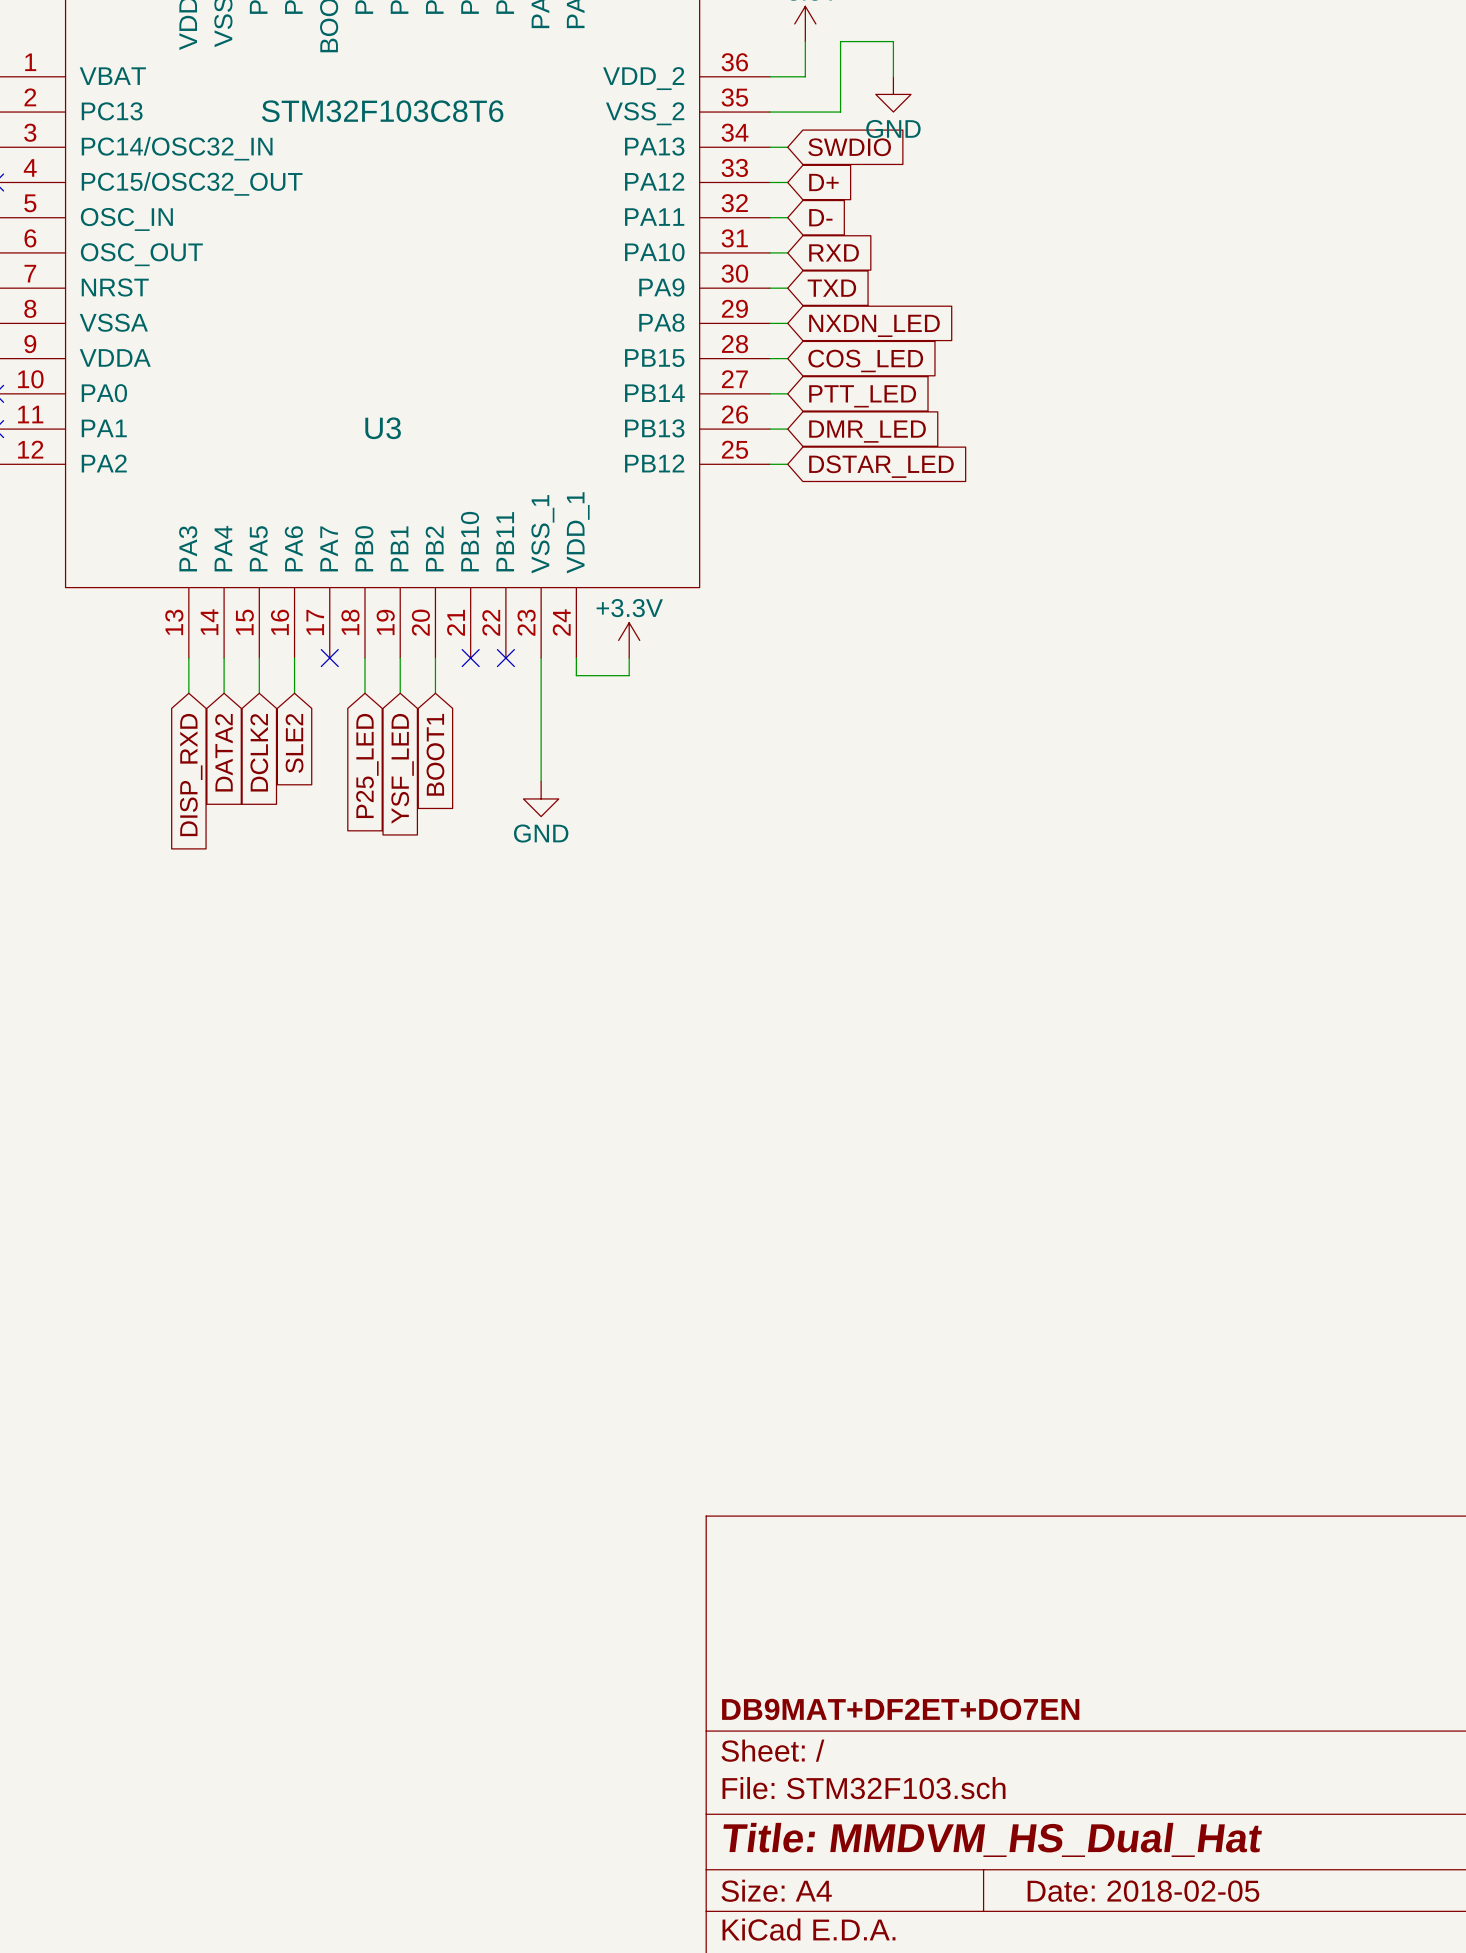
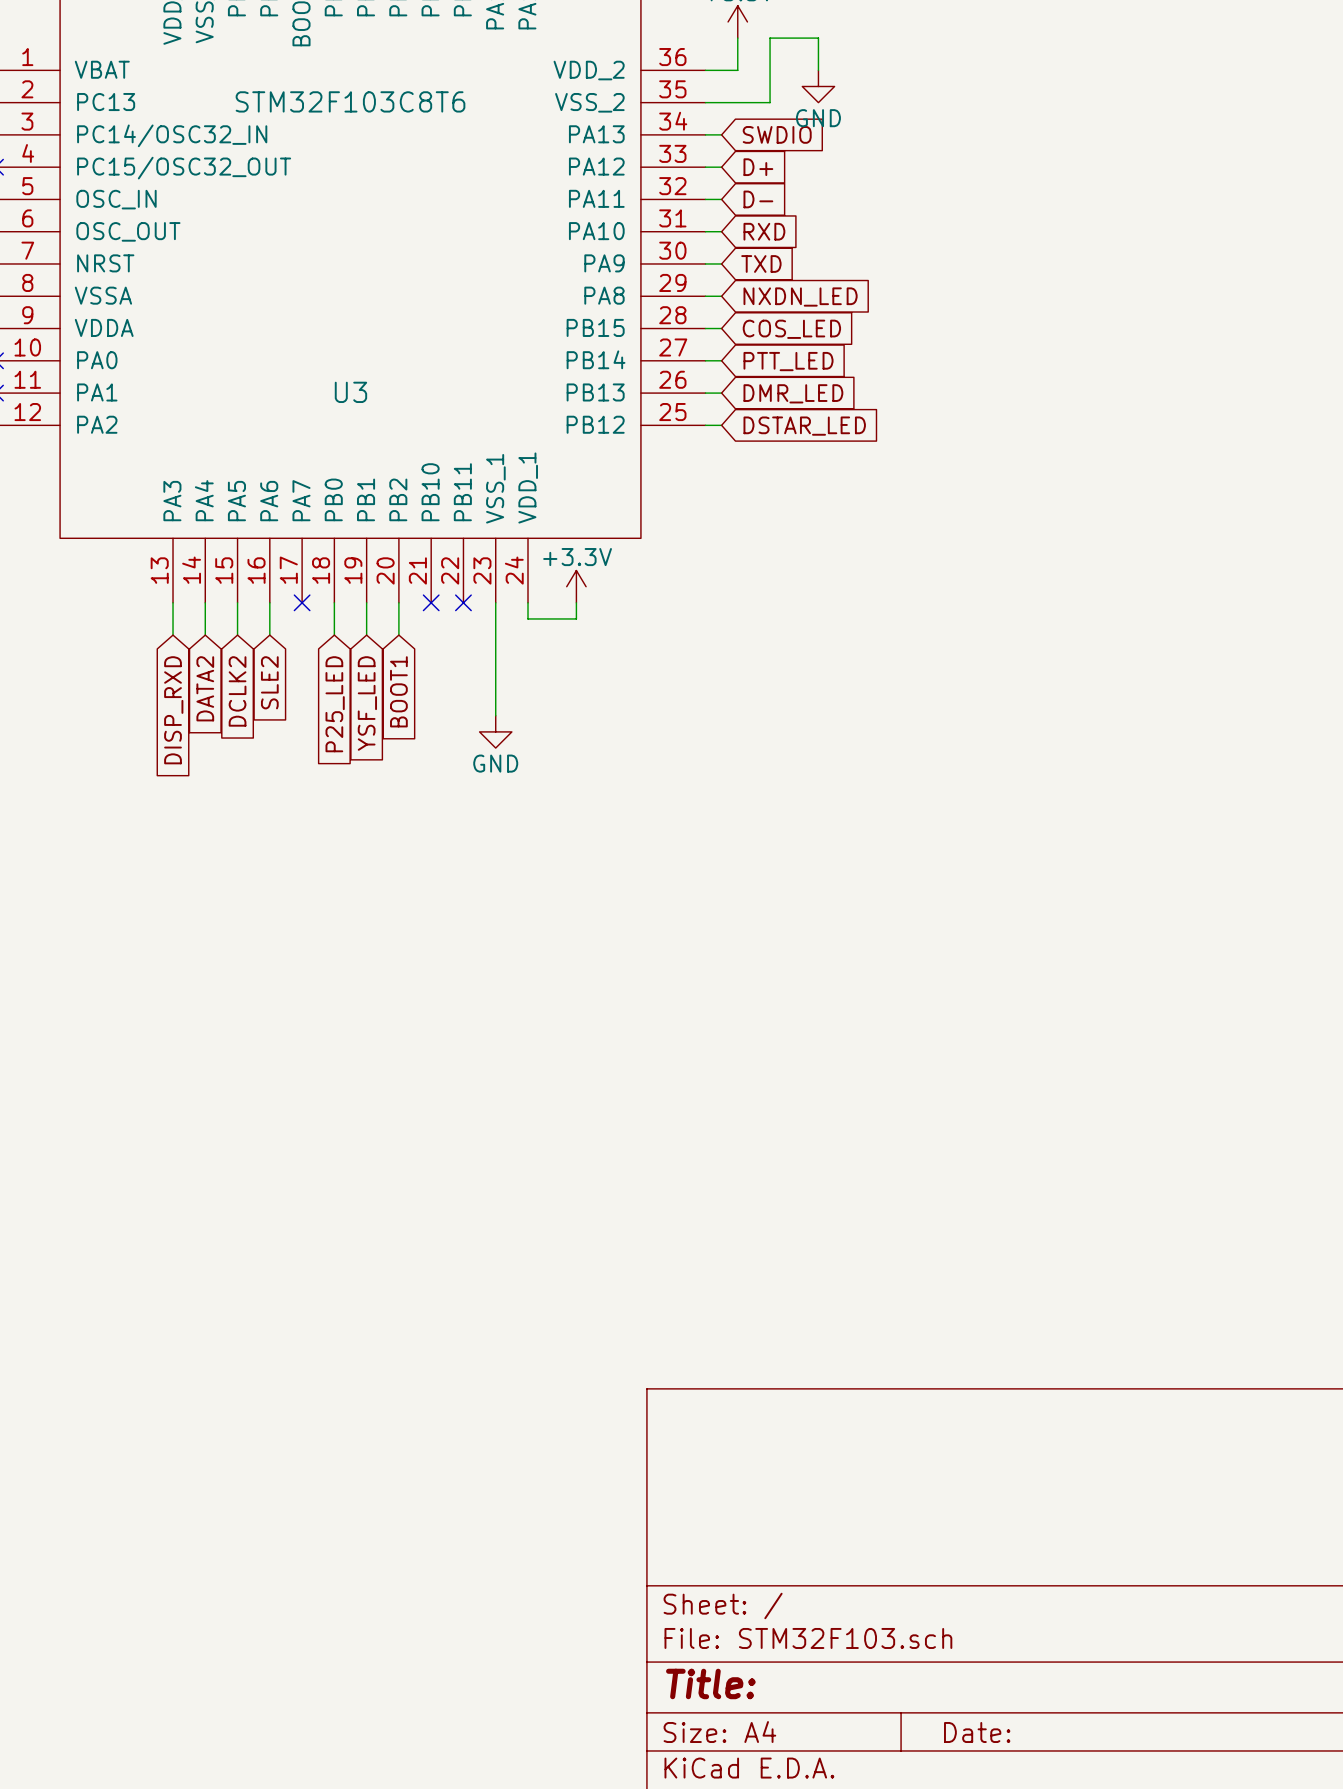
title block: DB9MAT+DF2ET+DO7EN (900, 1709) -> none
title block: Title: MMDVM_HS_Dual_Hat (992, 1839) -> Title: (710, 1683)
title block: Date: 2018-02-05 (1143, 1891) -> Date: (977, 1732)

